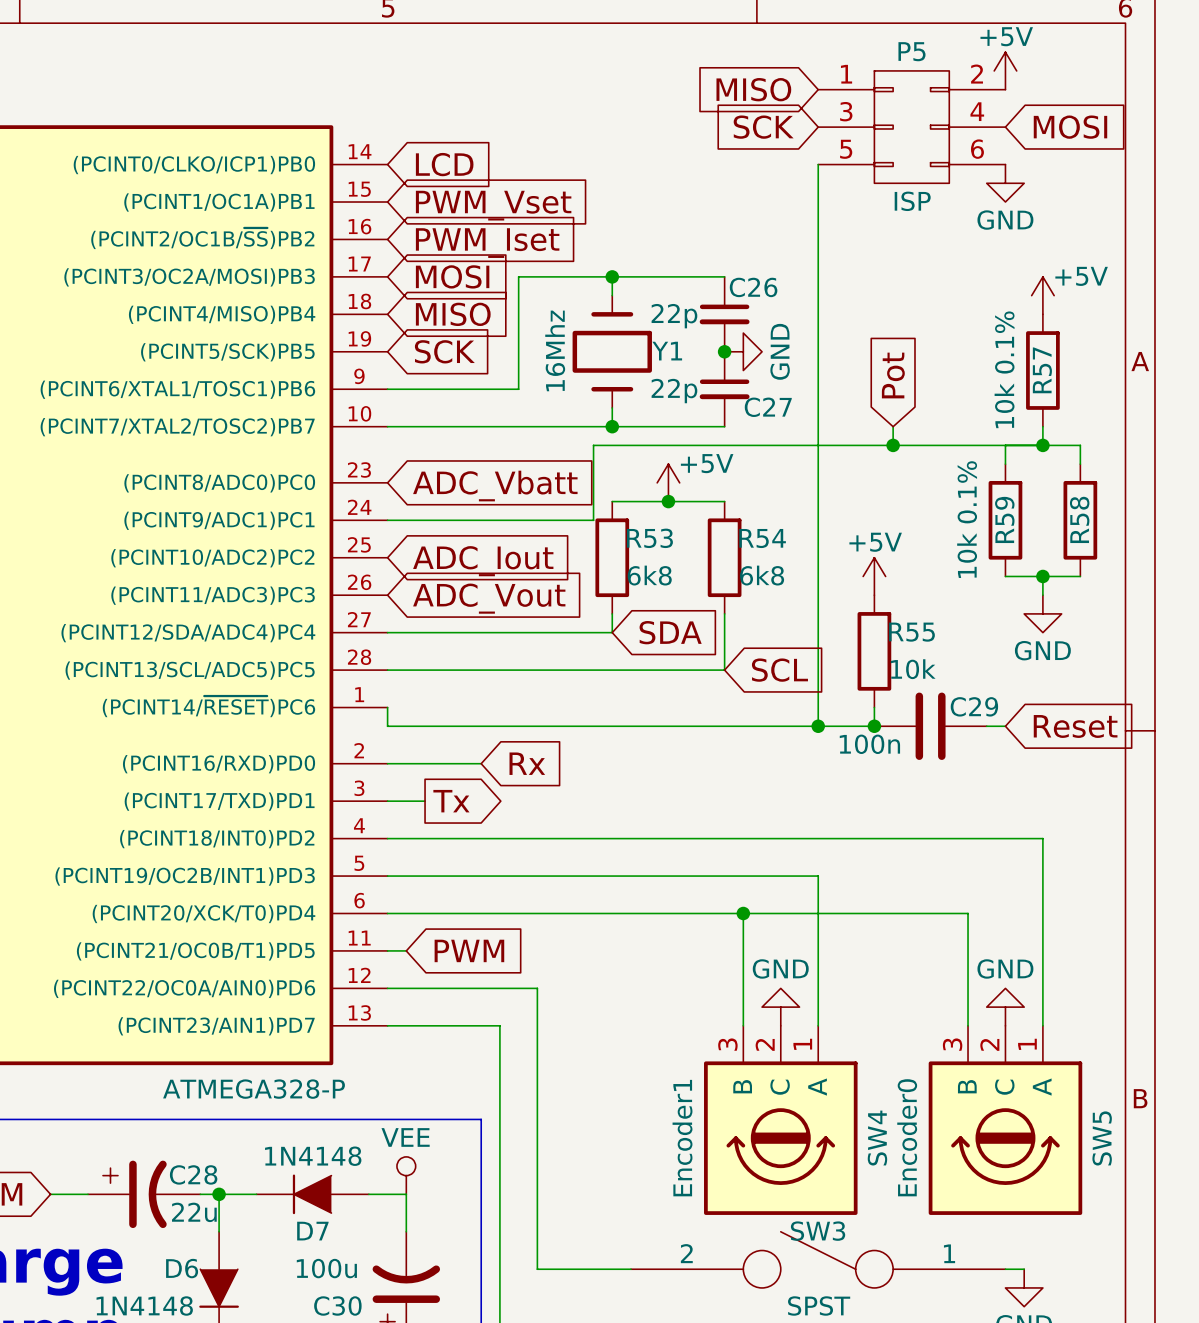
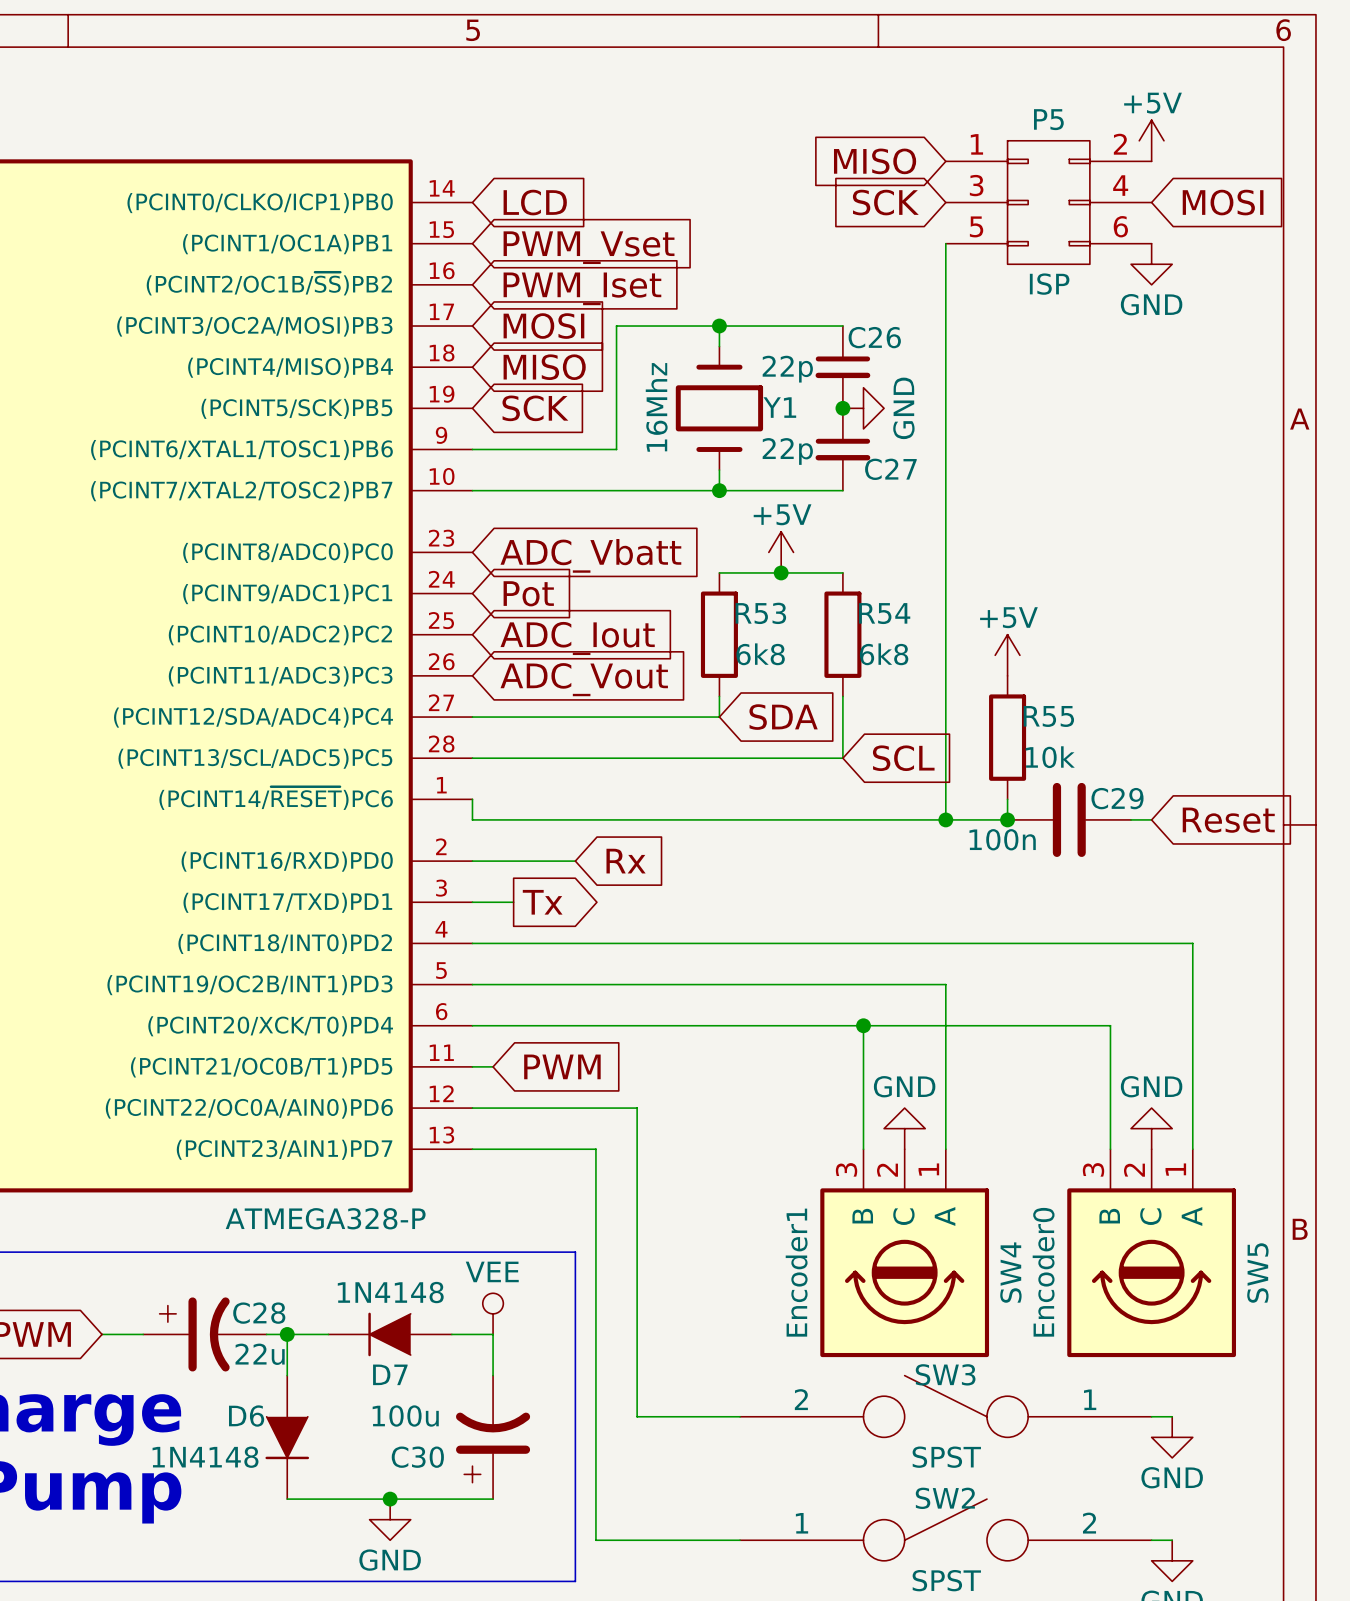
power symbol position: +5V (1005, 70) -> +5V (1151, 140)
global label: MISO (753, 89) -> none
global label: SCK (763, 127) -> MISO (875, 161)
P5 position: (911, 127) -> (1048, 202)
global label position: MOSI (1070, 127) -> MOSI (1223, 202)
global label: none -> SCK (885, 202)
wire: (818, 164) (818, 202) -> none
power symbol position: GND (1005, 183) -> GND (1151, 264)
power symbol: +5V (1042, 295) -> none
R57: 10k 0.1% (1042, 370) -> none
global label: Pot (893, 375) -> none
wire: (893, 426) (893, 445) -> none
wire: (1042, 426) (1042, 445) -> none
junction: (893, 445) -> none
wire: (1005, 445) (1005, 464) -> none
junction: (1042, 445) -> none
power symbol text position: +5V (707, 463) -> +5V (782, 514)
wire: (1080, 464) (1080, 445) (593, 445) (593, 520) (387, 520) -> none
global label: none -> Pot (528, 593)
R59: 10k 0.1% (1005, 520) -> none
R58: (1080, 520) -> none
wire: (1005, 576) (1080, 576) -> none
wire: (1042, 576) (1042, 595) -> none
junction: (1042, 576) -> none
power symbol: GND (1042, 613) -> none

